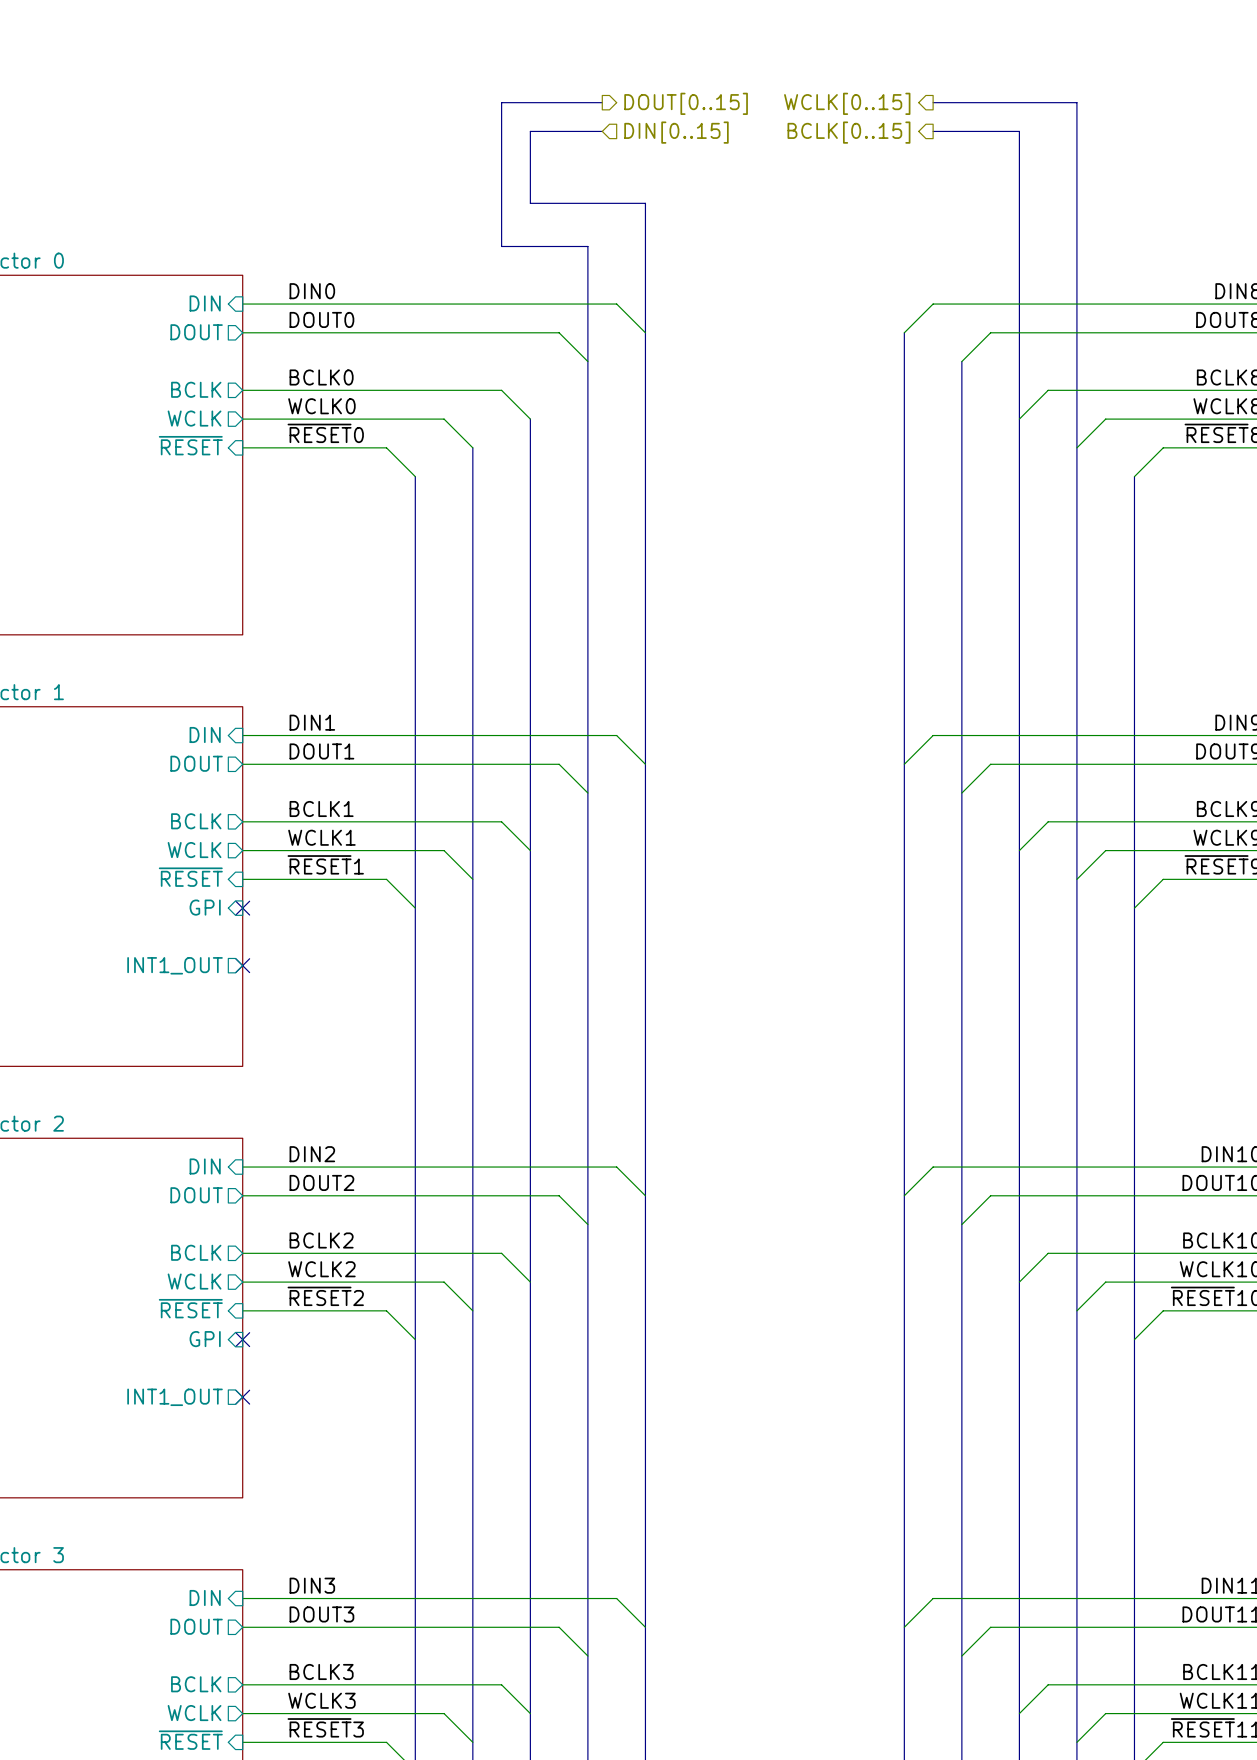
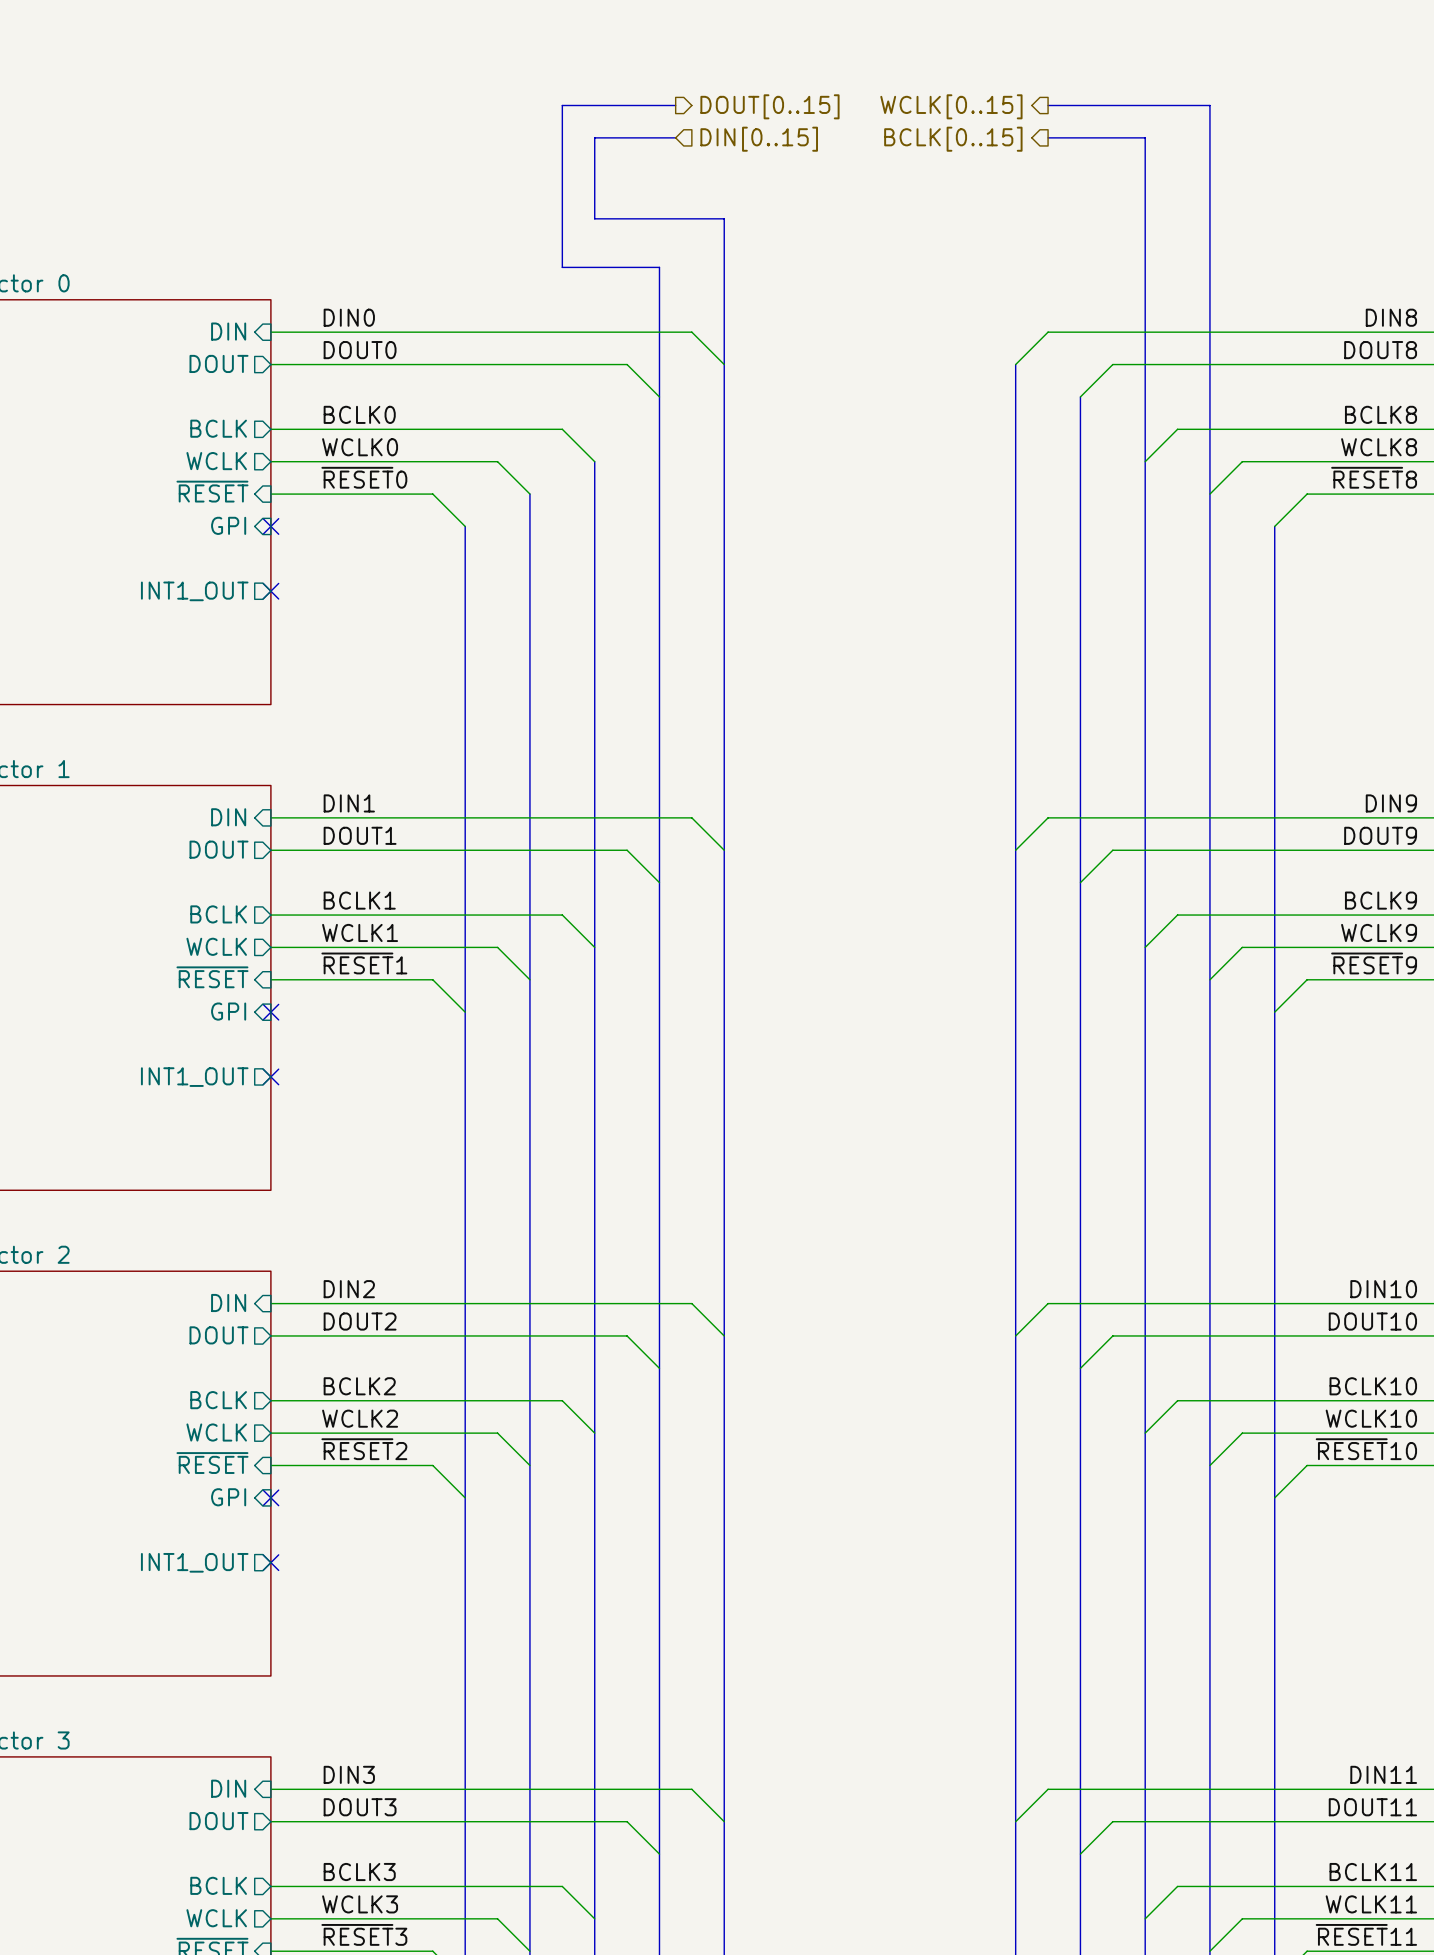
sheet pin: none -> GPI (228, 525)
no-connect mark: none -> (270, 526)
sheet pin: none -> INT1_OUT (194, 591)
no-connect mark: none -> (270, 591)

